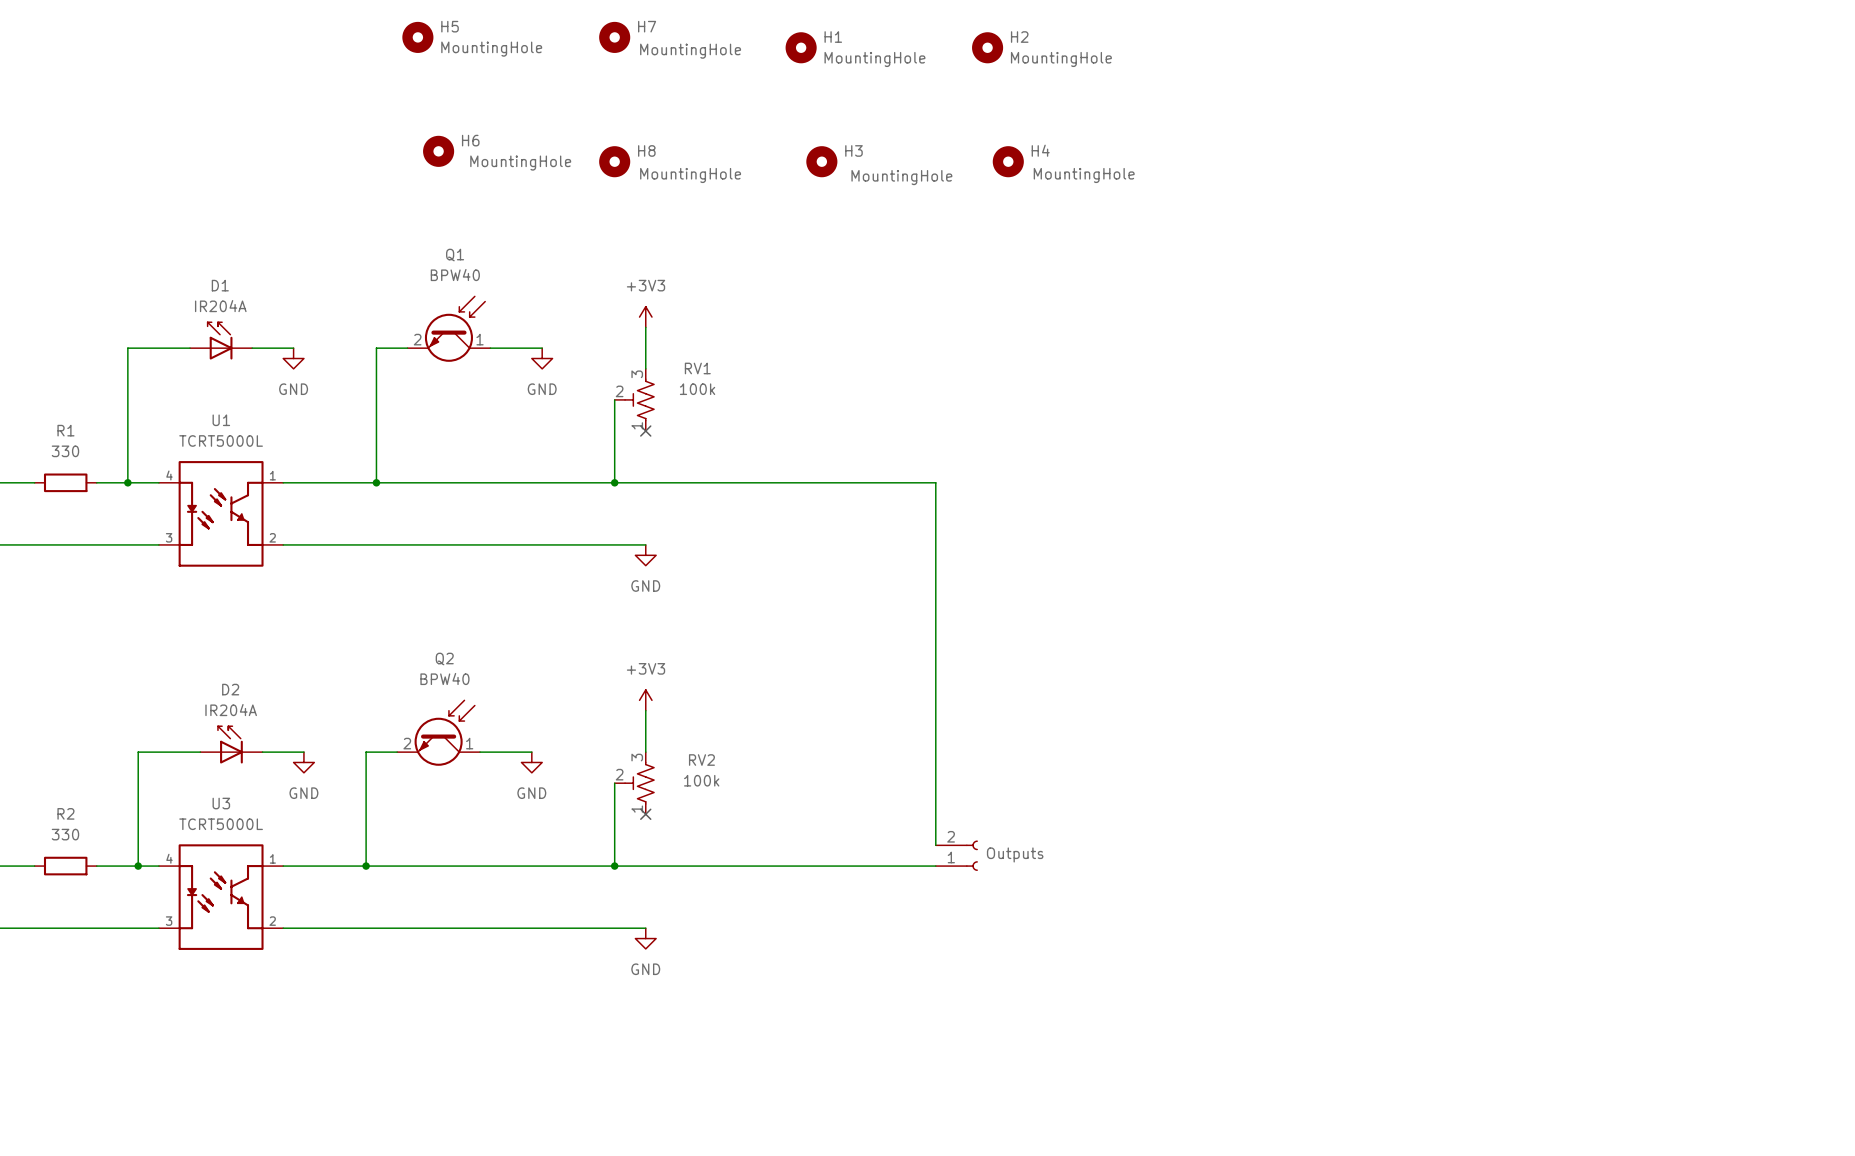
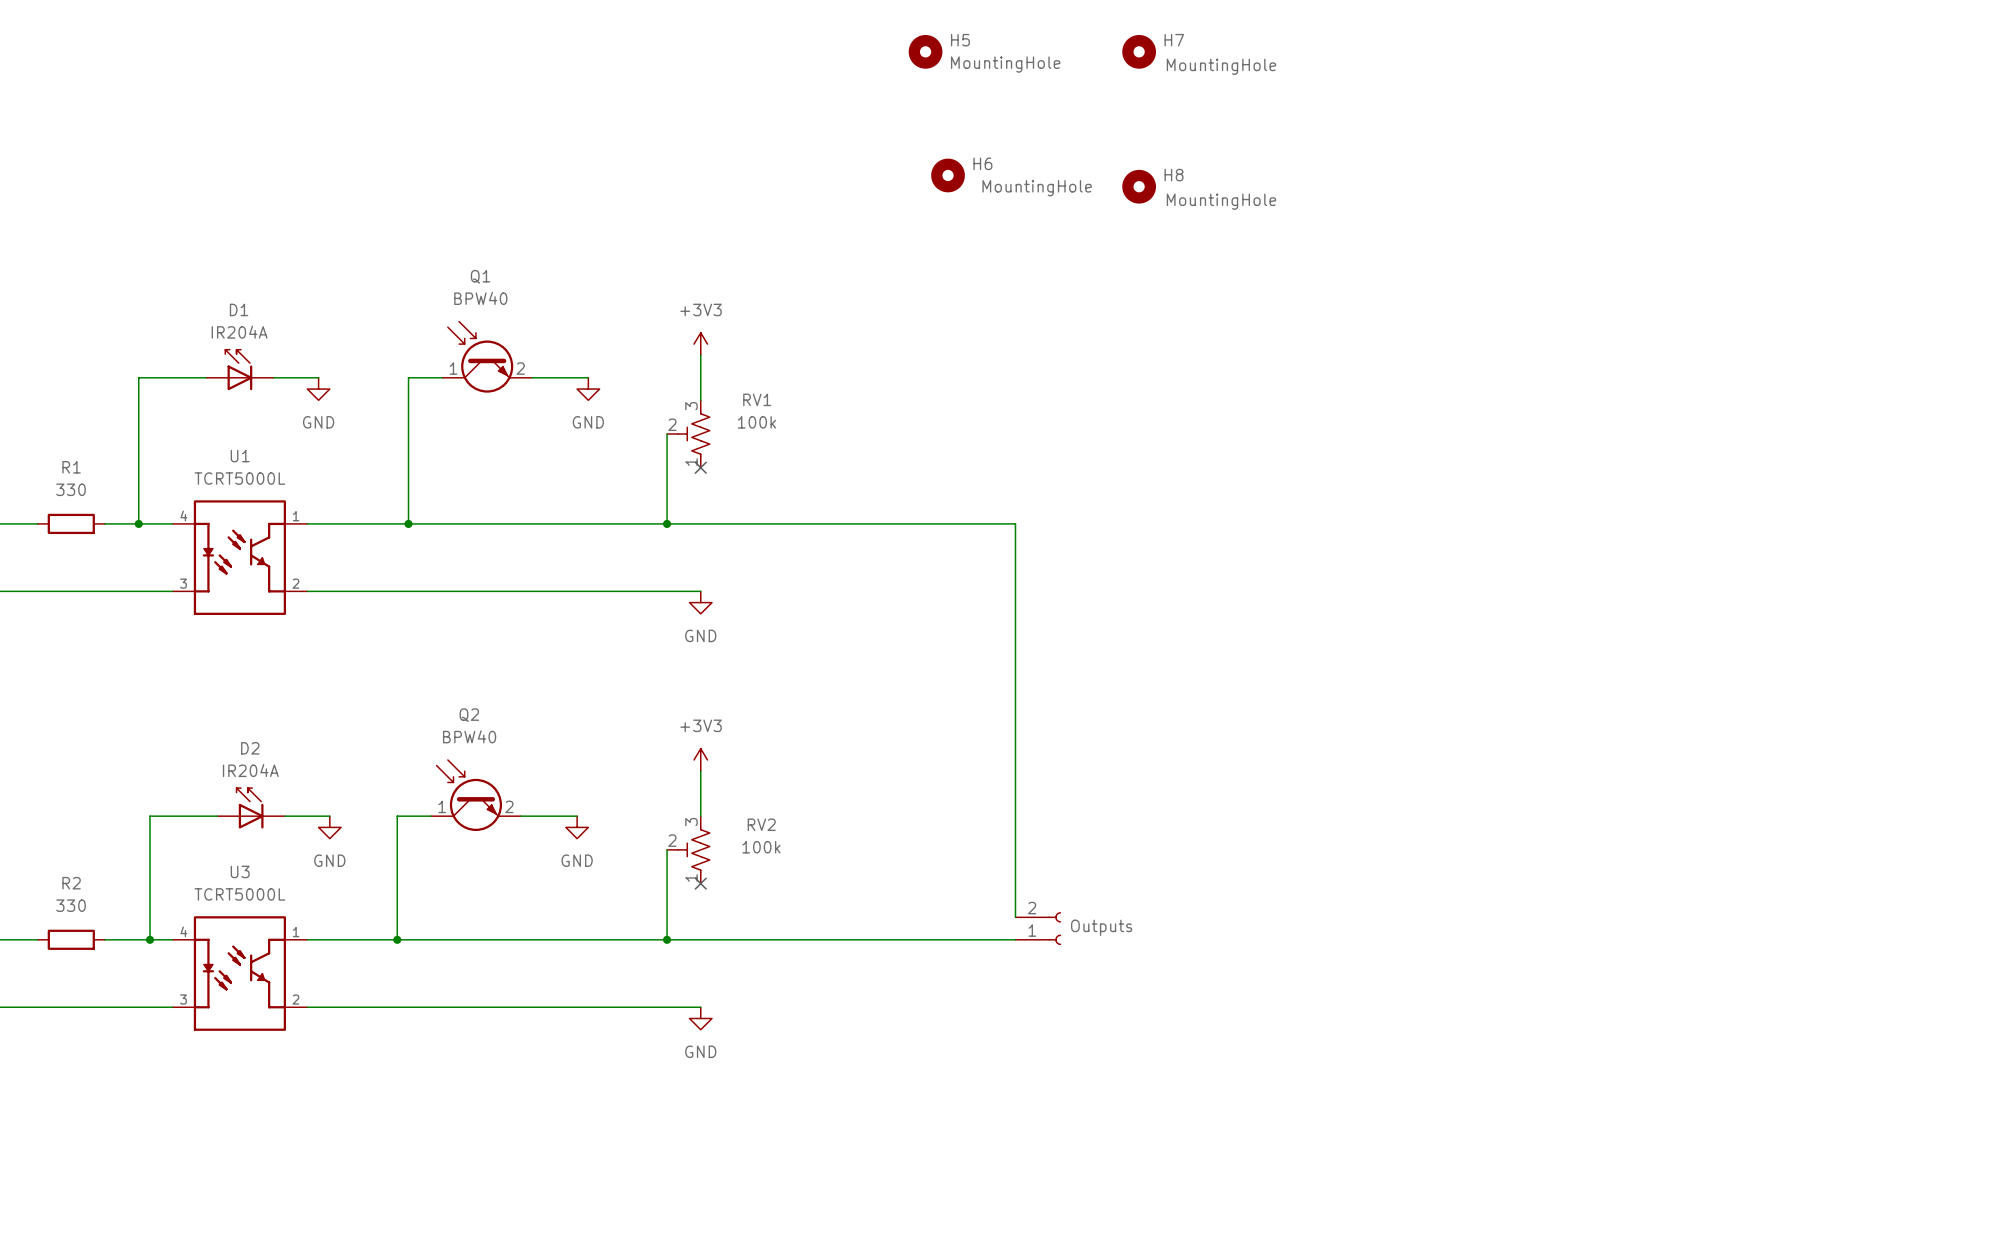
H5 position: (417, 37) -> (925, 51)
H7 position: (614, 37) -> (1139, 51)
H1: MountingHole (801, 47) -> none
H2: MountingHole (987, 47) -> none
H6 position: (438, 151) -> (948, 175)
H8 position: (614, 161) -> (1139, 186)
H3: MountingHole (821, 161) -> none
H4: MountingHole (1008, 161) -> none
Q1 flip: as is (455, 329) -> left-right (480, 357)
Q2 flip: as is (444, 733) -> left-right (469, 795)

